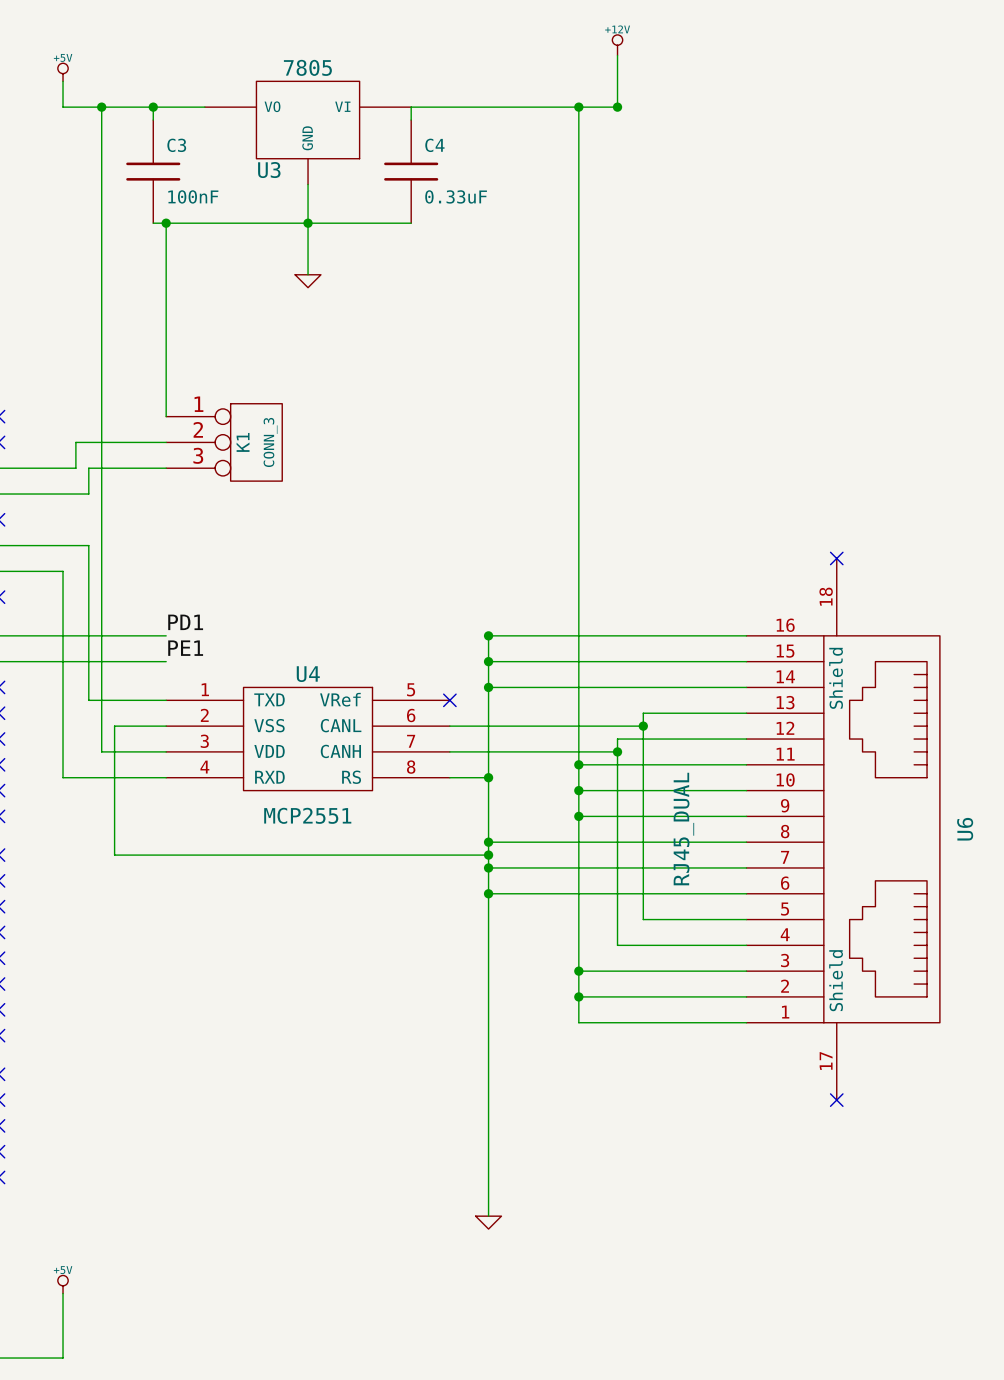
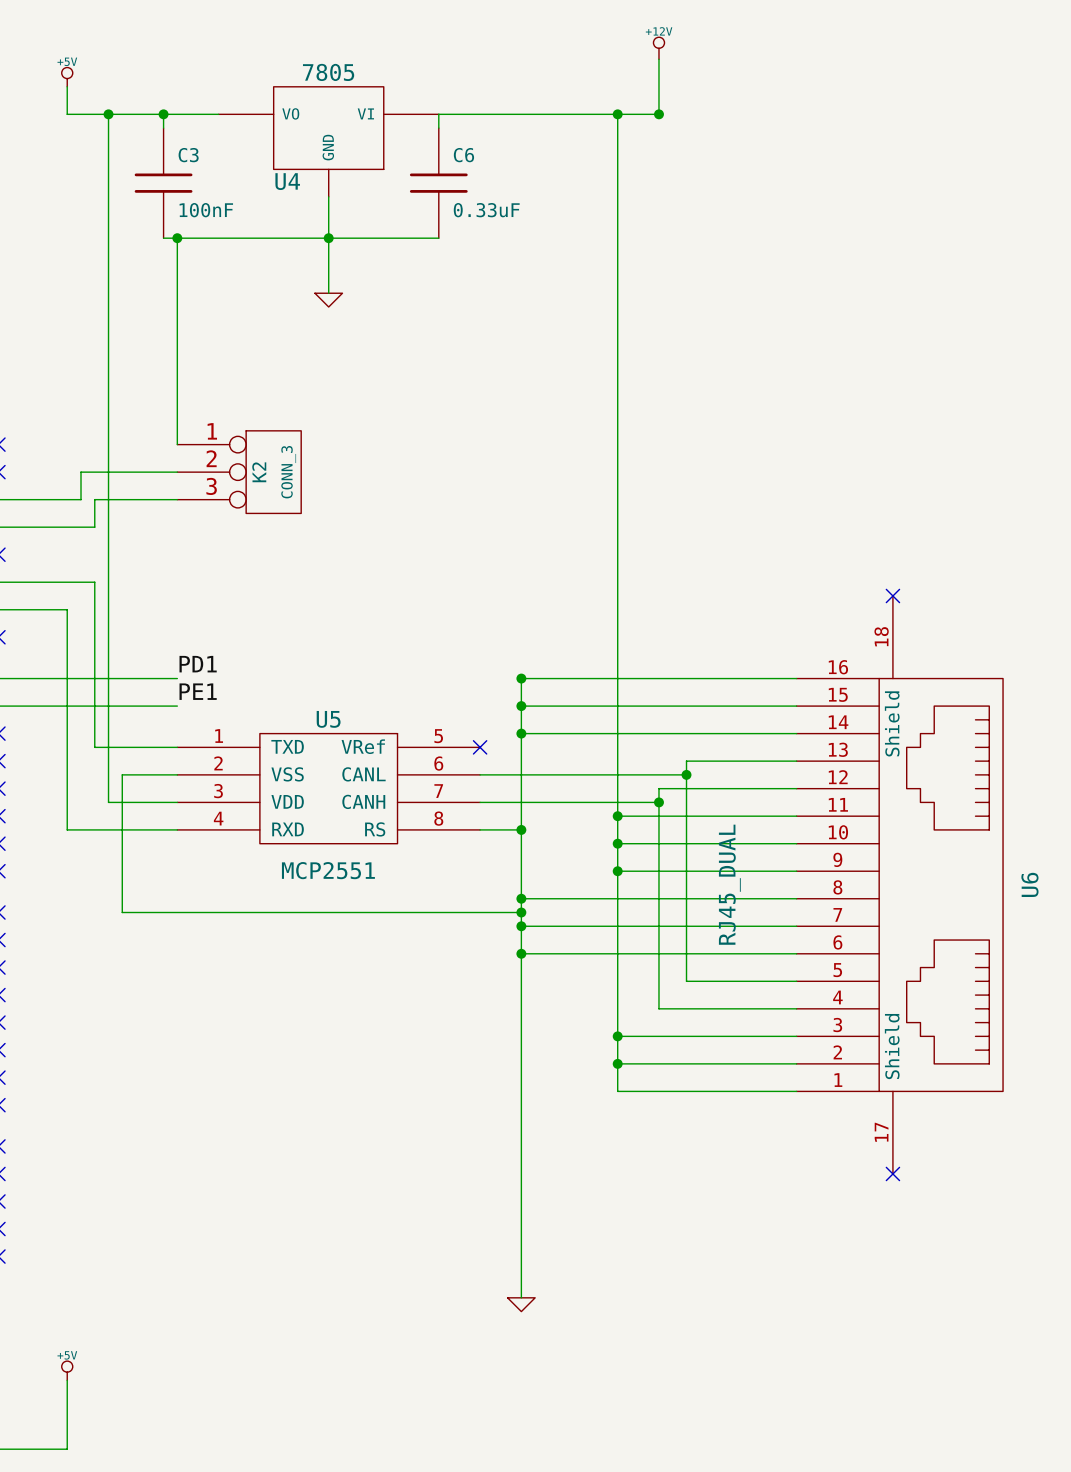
C4 name: C4 (434, 145) -> C6 (463, 155)
U3 name: U3 (269, 170) -> U4 (287, 181)
K1 name: K1 (243, 442) -> K2 (259, 472)
U4 name: U4 (308, 674) -> U5 (328, 719)

